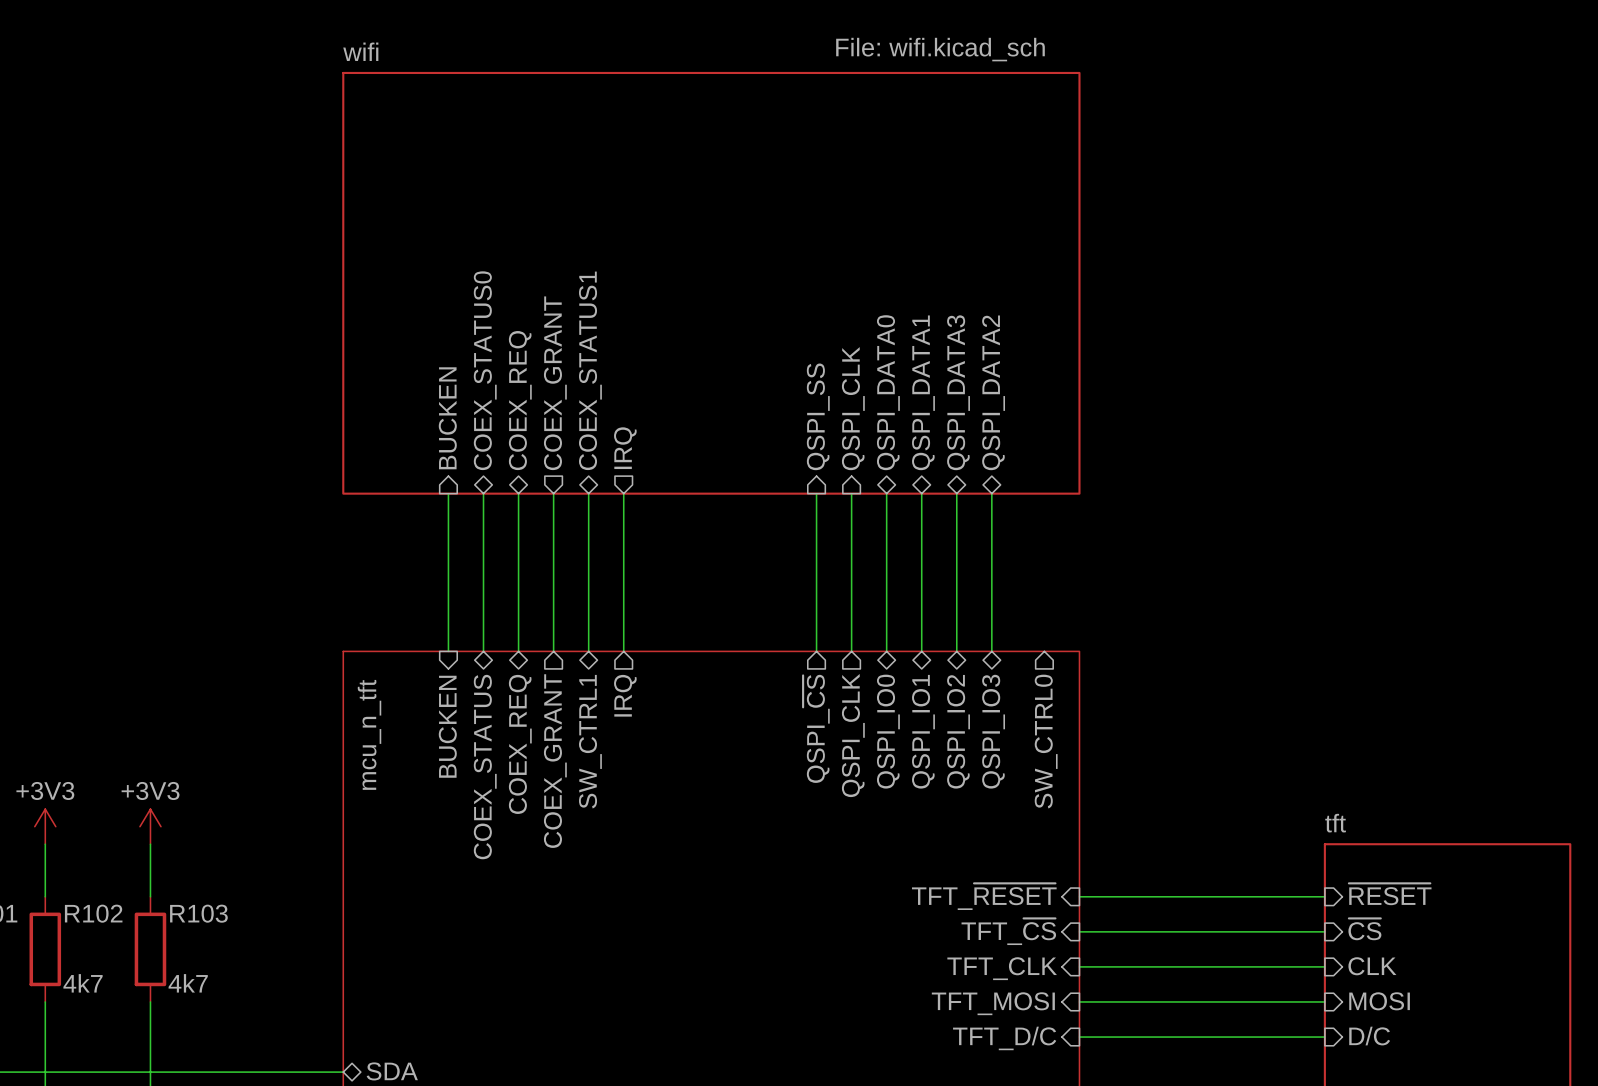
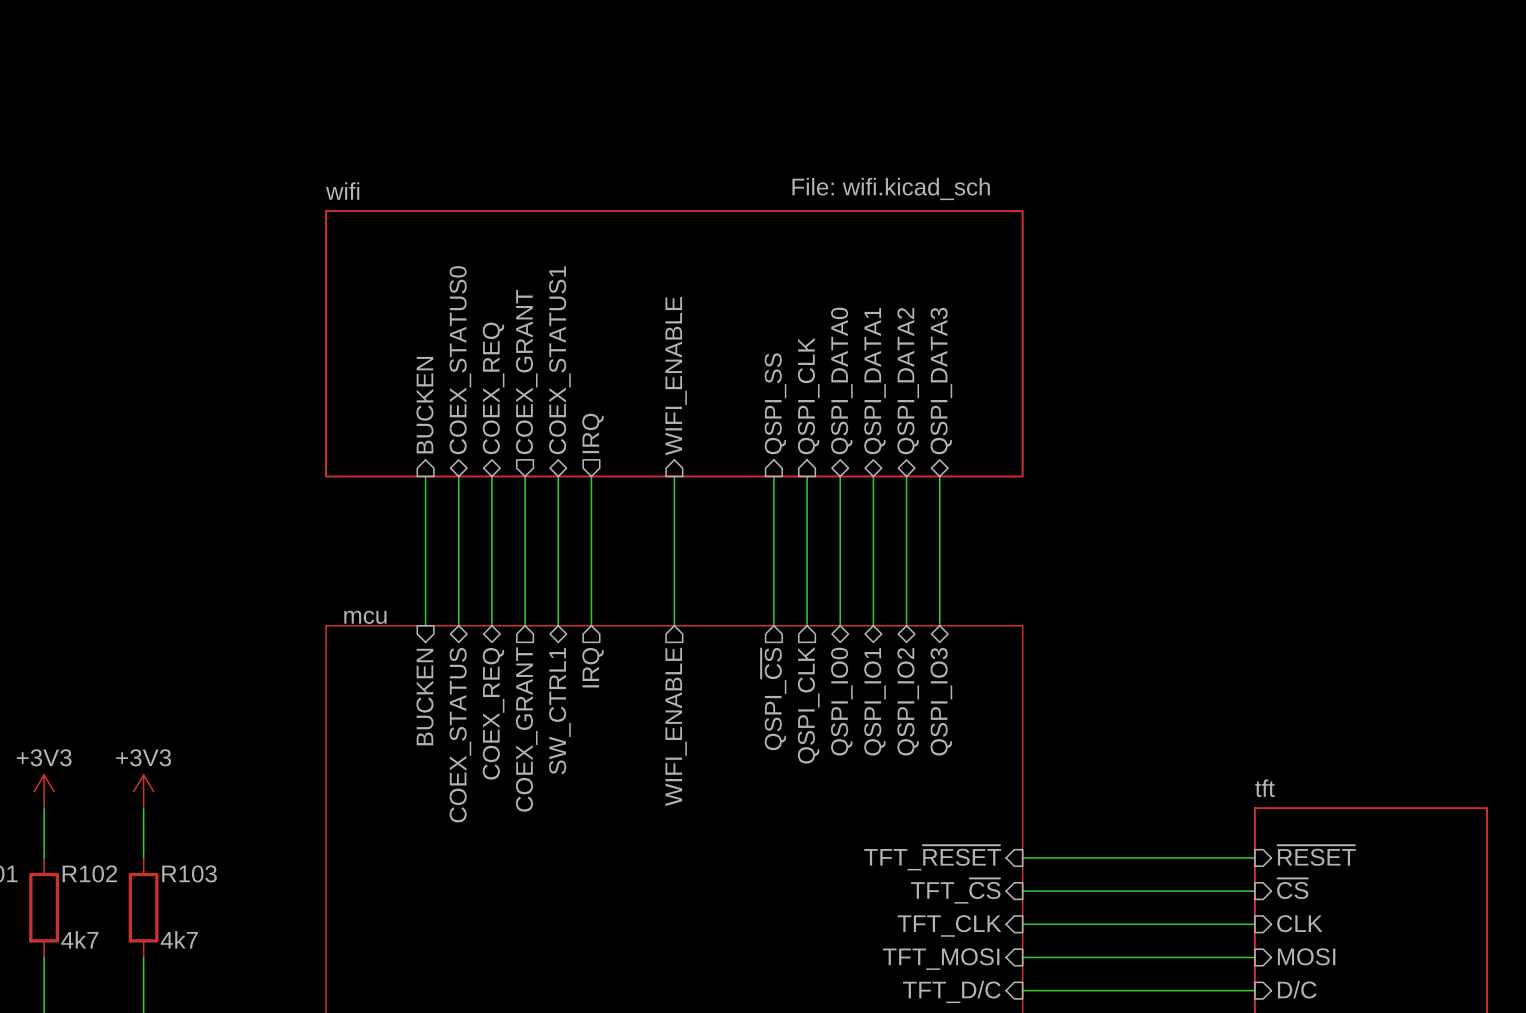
sheet wifi: File: wifi.kicad_sch (711, 283) -> none
sheet wifi: none -> File: wifi.kicad_sch (674, 343)
sheet pin: none -> WIFI_ENABLE (676, 376)
sheet pin: QSPI_DATA3 (958, 392) -> QSPI_DATA2 (908, 381)
sheet pin: QSPI_DATA2 (993, 392) -> QSPI_DATA3 (941, 381)
wire: none -> (674, 476) (674, 625)
sheet mcu_n_tft name: mcu_n_tft (369, 734) -> mcu (365, 617)
sheet pin: SW_CTRL0 (1046, 741) -> none
sheet pin: none -> WIFI_ENABLE (676, 726)

